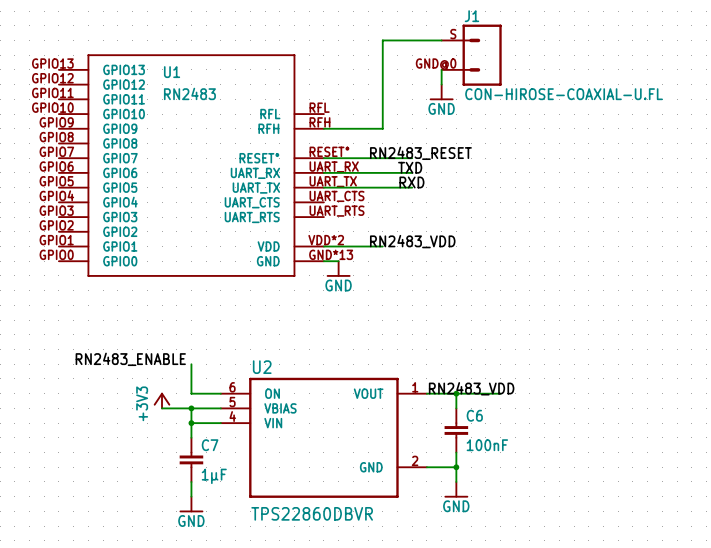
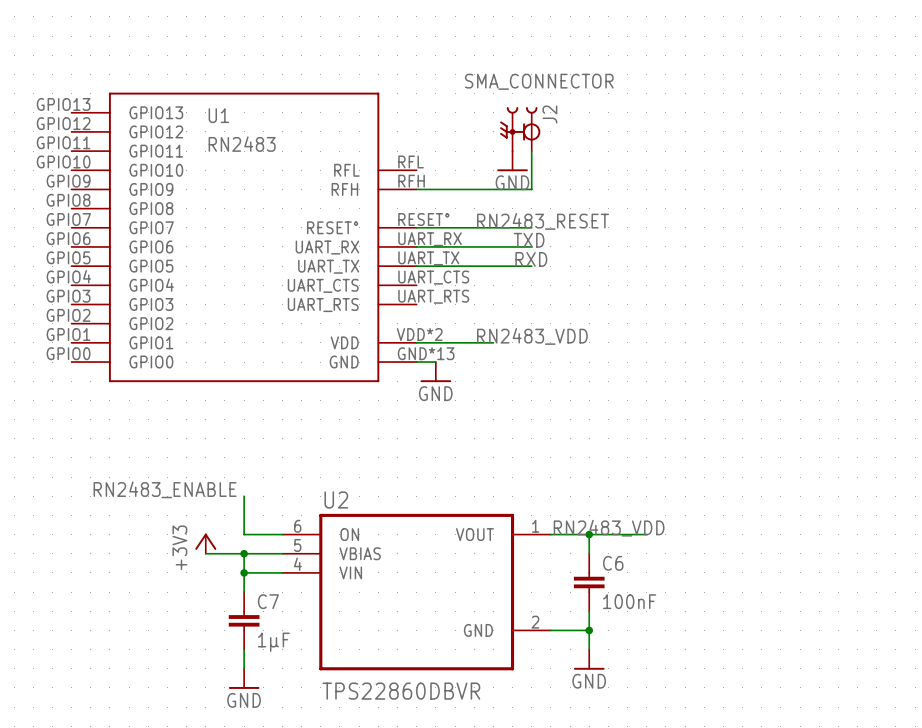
wire: (441, 40) (382, 40) (382, 128) -> (531, 151) (531, 189) (493, 189)
J1: CON-HIROSE-COAXIAL-U.FL (471, 55) -> none
wire: (441, 69) (441, 84) -> none
J2: none -> SMA_CONNECTOR (520, 129)
power symbol position: GND (441, 92) -> GND (512, 161)

